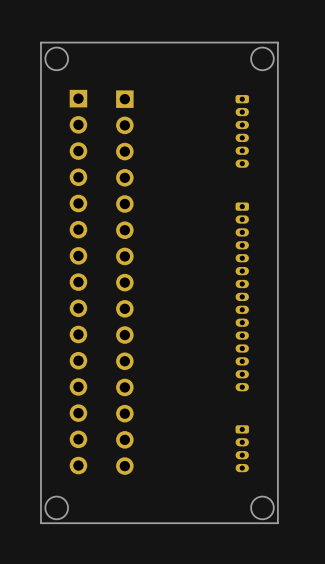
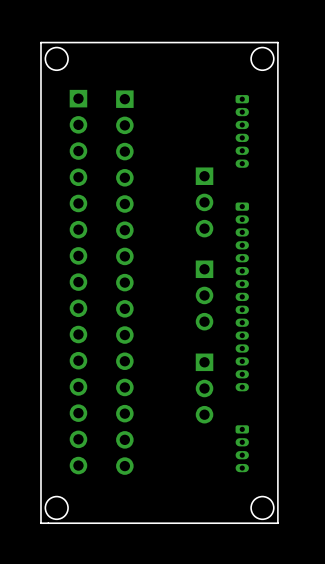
part: none -> (204, 202)
part: none -> (204, 295)
part: none -> (204, 388)

